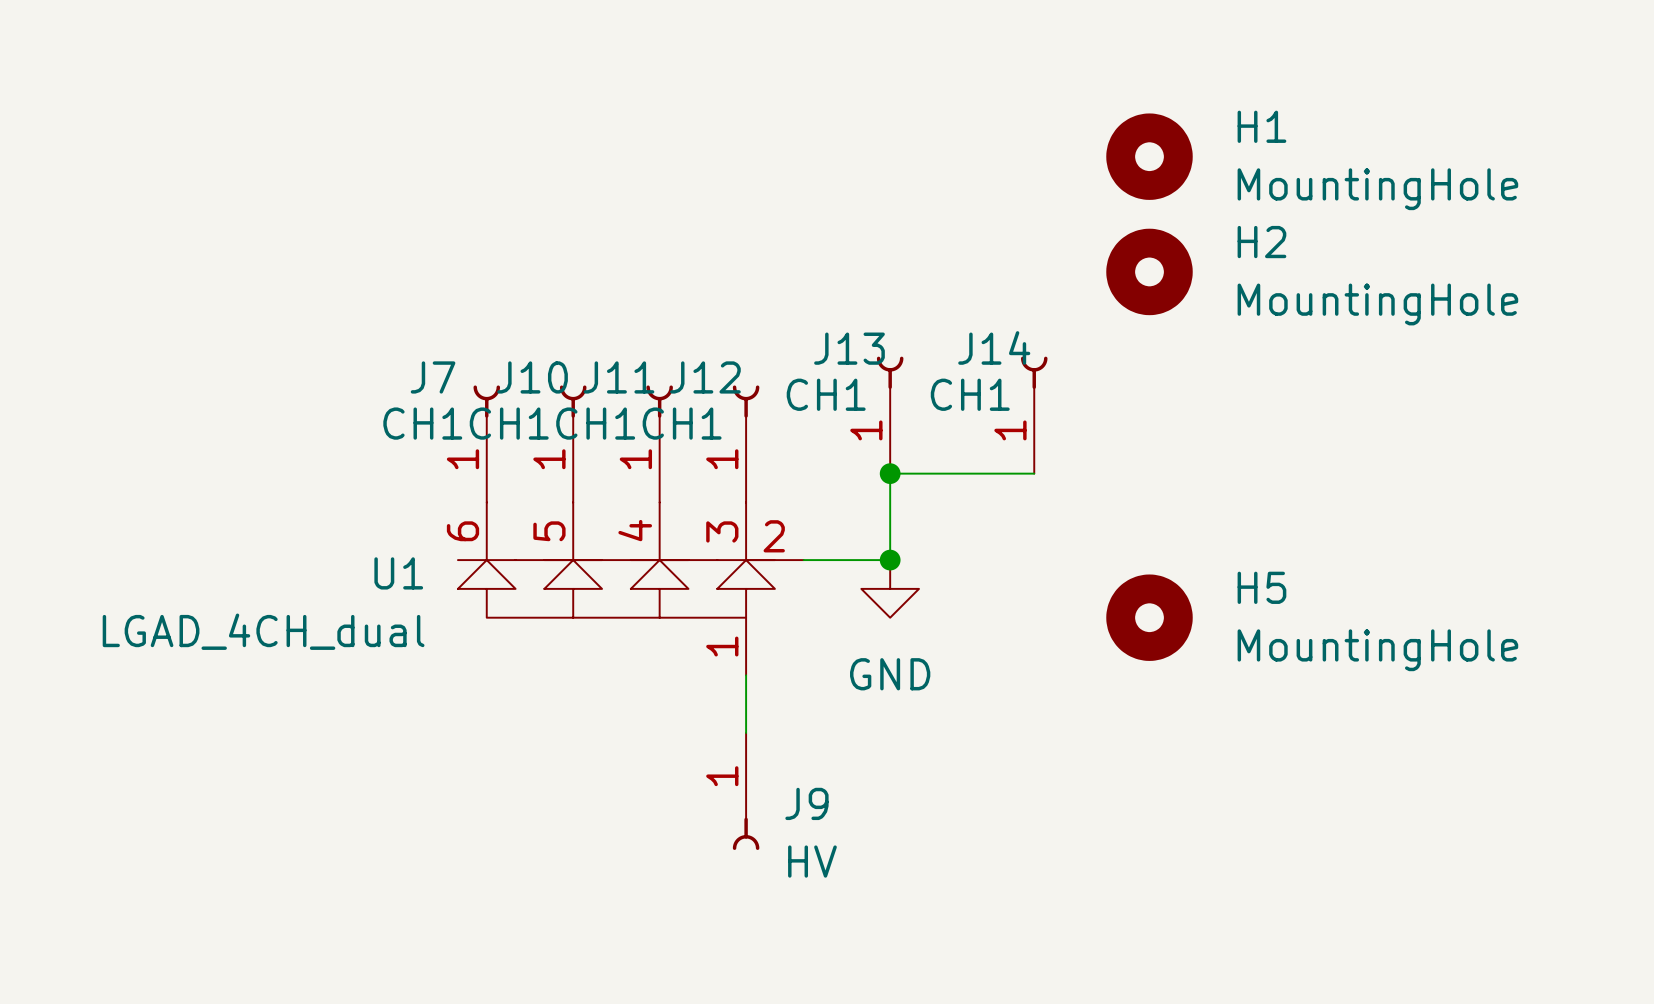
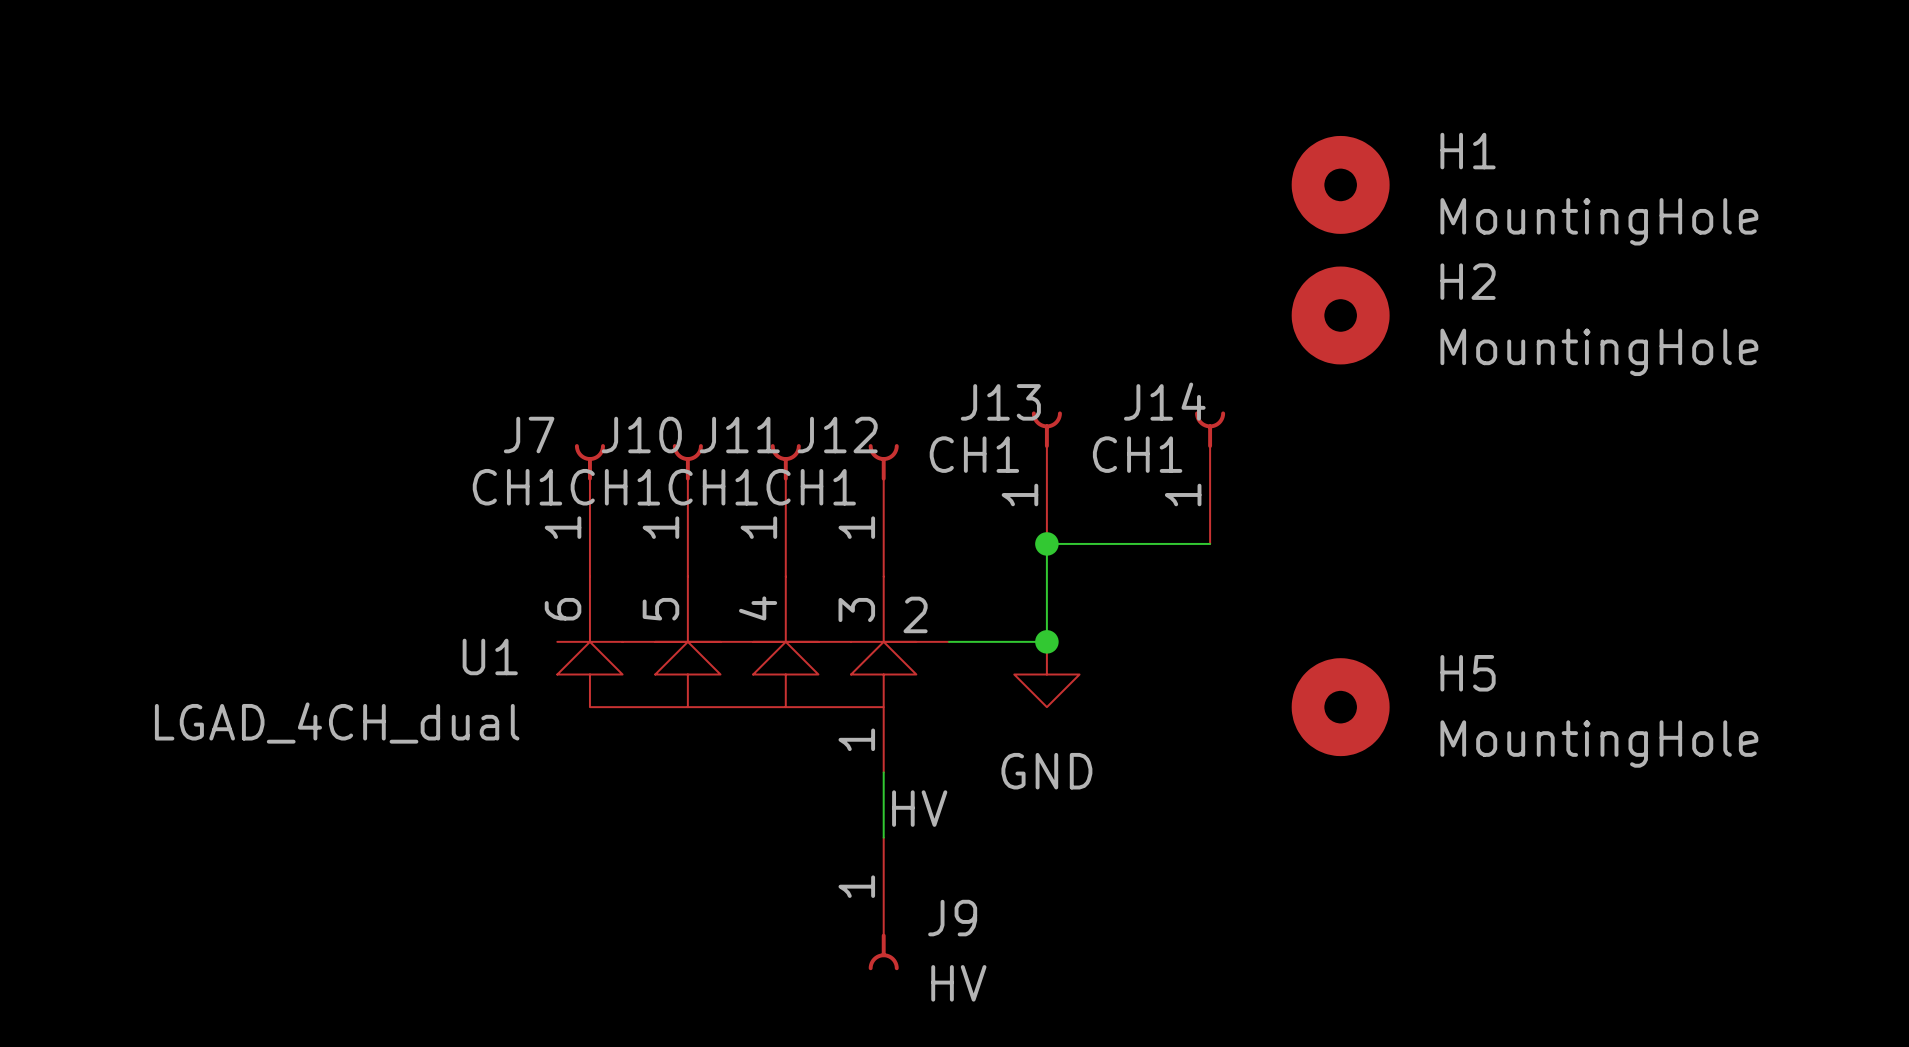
label: none -> HV (919, 808)

